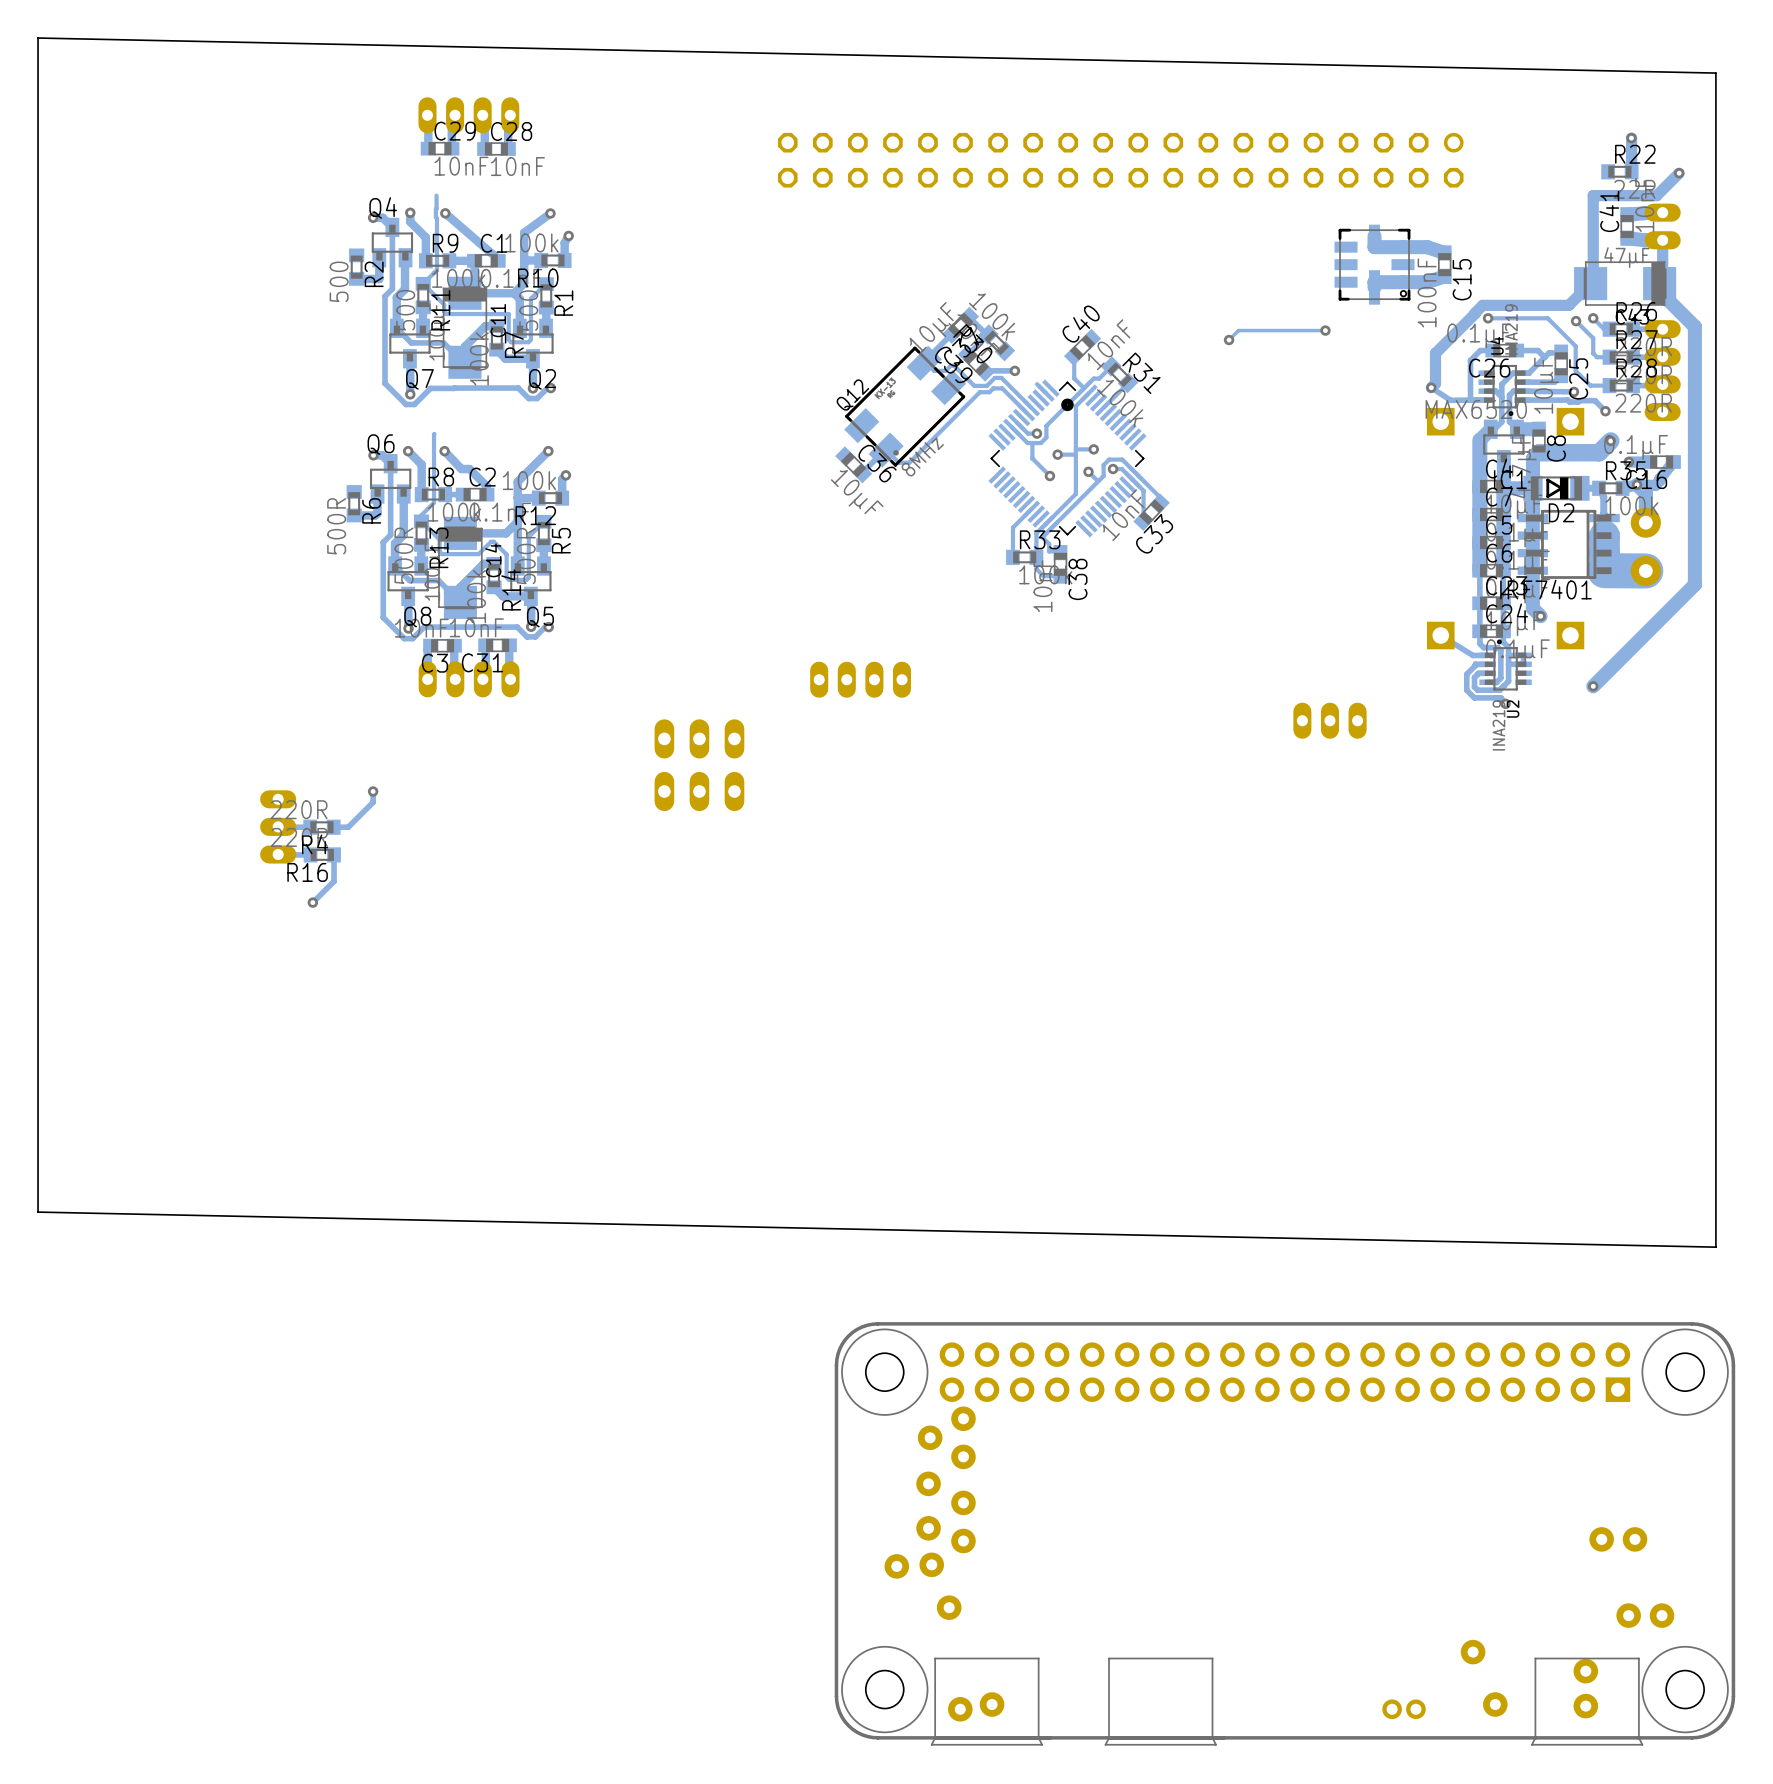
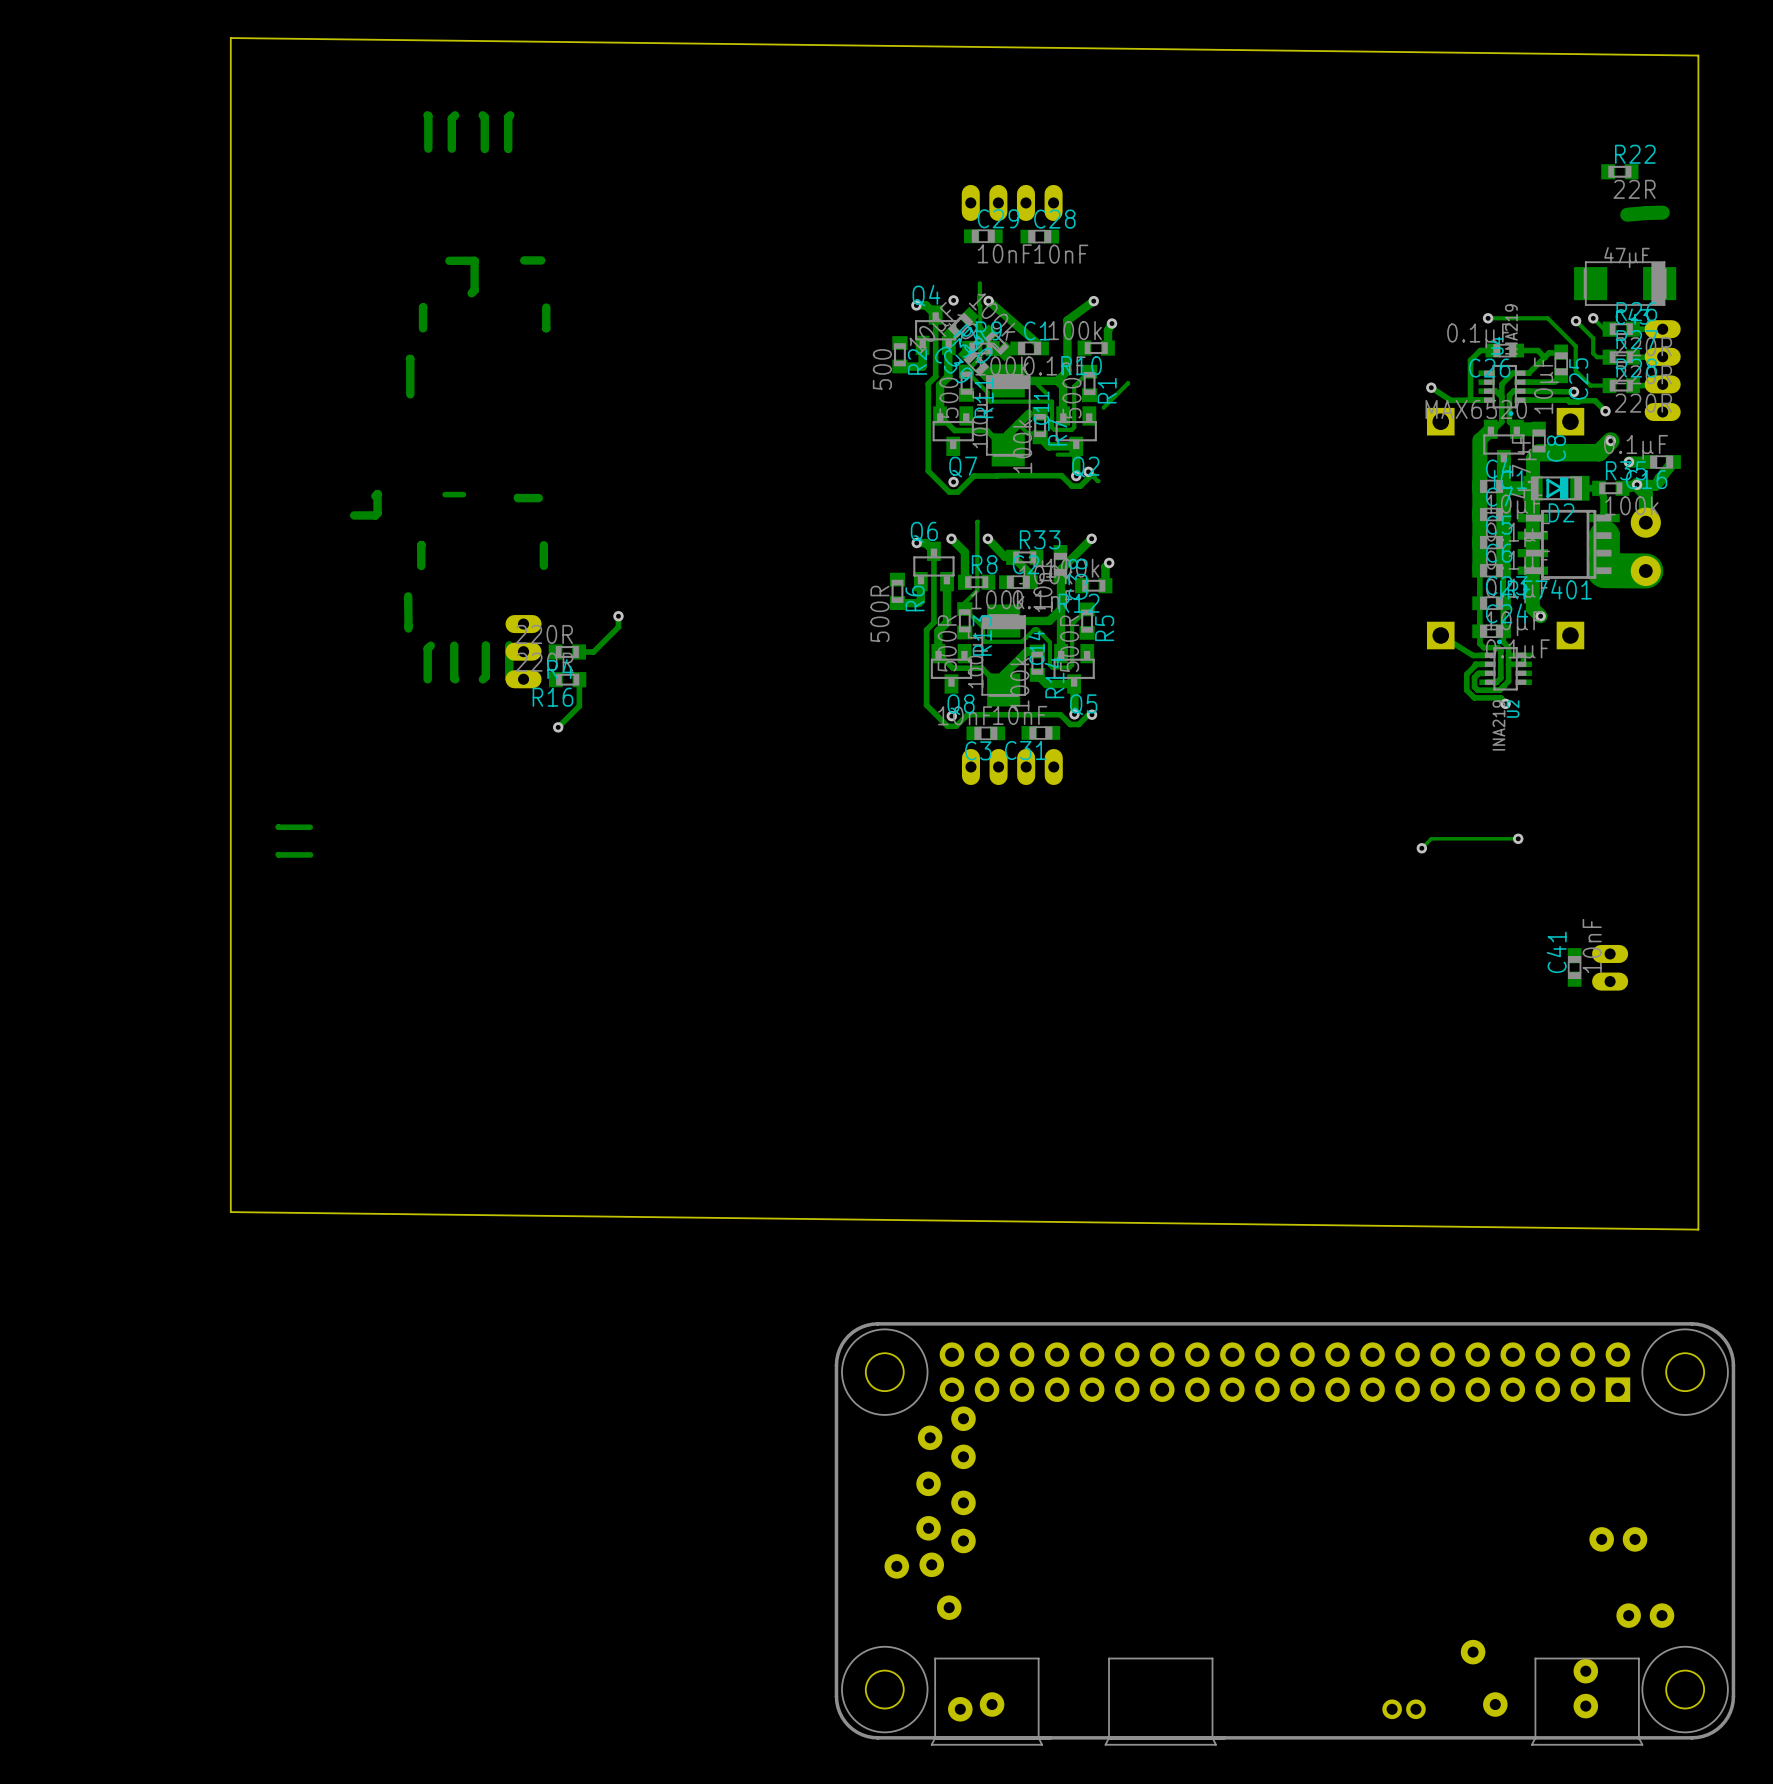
board edge: (38, 38) (38, 1212) (1715, 1247) (1715, 73) (38, 38) -> (230, 38) (1698, 55) (1698, 1229) (230, 1212) (230, 38)
part: (468, 115) -> none
track: (1631, 138) (1631, 171) -> none
via: (1631, 138) -> none
C29 position: (440, 148) -> (983, 236)
C28 position: (496, 149) -> (1039, 236)
part: (1120, 160) -> none
track: (1679, 173) (1656, 195) (1593, 195) (1593, 281) (1568, 305) (1482, 305) (1435, 353) (1435, 383) (1431, 387) -> none
via: (1679, 173) -> none
track: (436, 195) (436, 270) (423, 283) (444, 304) (444, 311) (446, 314) (508, 314) (508, 339) (511, 342) (528, 342) (530, 339) (530, 298) (546, 284) -> none
part: none -> (1012, 202)
track: (410, 212) (410, 221) (425, 237) (425, 260) -> none
via: (410, 212) -> none
track: (445, 213) (498, 260) -> none
via: (445, 213) -> none
track: (550, 213) (524, 232) (524, 283) (514, 293) -> none
via: (550, 213) -> none
track: (373, 217) (382, 217) (392, 227) (392, 288) (385, 296) (385, 383) (406, 404) (414, 404) (430, 388) (518, 388) (528, 398) (537, 398) (547, 388) (550, 388) -> none
via: (373, 217) -> none
C41 position: (1627, 226) -> (1574, 967)
part: (1662, 226) -> none
track: (568, 235) (564, 242) (564, 260) -> none
via: (568, 235) -> none
track: (1374, 236) (1374, 247) (1427, 247) (1444, 252) -> none
track: (1627, 238) (1662, 240) (1662, 280) (1659, 283) (1659, 291) (1694, 326) (1694, 584) (1593, 686) -> none
Q4 position: (392, 242) -> (935, 330)
track: (379, 257) (379, 279) (356, 278) -> none
track: (405, 257) (405, 289) (396, 297) (396, 328) (411, 342) (443, 342) (464, 362) (464, 346) (485, 326) -> none
R9 position: (437, 260) -> (980, 348)
C1 position: (486, 260) -> (1029, 348)
R10 position: (552, 260) -> (1096, 348)
part: (1374, 264) -> none
C15: 100nF (1444, 264) -> none
R2 position: (356, 267) -> (899, 354)
track: (1444, 276) (1427, 282) (1374, 282) (1374, 287) -> none
track: none -> (979, 283) (980, 357) (966, 371) (987, 392) (987, 399) (989, 401) (1052, 401) (1052, 427) (1054, 429) (1071, 429) (1074, 427) (1074, 386) (1089, 371)
track: (514, 293) (464, 293) -> none
track: (514, 293) (519, 298) (519, 328) -> none
R11 position: (423, 295) -> (966, 383)
R1 position: (546, 295) -> (1089, 383)
via: none -> (953, 300)
track: none -> (988, 300) (1041, 348)
via: none -> (988, 300)
track: none -> (1093, 301) (1067, 320) (1067, 370) (1057, 380)
via: none -> (1093, 301)
track: none -> (916, 305) (926, 305) (935, 315) (935, 376) (928, 383) (928, 471) (949, 492) (957, 492) (973, 476) (1061, 475) (1072, 486) (1080, 486) (1090, 475) (1094, 475)
via: none -> (916, 305)
track: none -> (1111, 323) (1107, 330) (1107, 348)
via: none -> (1111, 323)
C11 position: (464, 327) -> (1008, 415)
track: (1325, 330) (1238, 330) (1229, 340) -> none
via: (1325, 330) -> none
track: (952, 333) (924, 363) -> none
R7 position: (496, 337) -> (1040, 425)
via: (1229, 340) -> none
Q7 position: (409, 343) -> (953, 431)
Q2 position: (532, 343) -> (1076, 431)
track: none -> (922, 345) (922, 366) (899, 366)
track: none -> (948, 345) (948, 376) (940, 385) (940, 415) (954, 430) (986, 430) (1008, 449) (1008, 434) (1028, 413)
C40: 10nF (1082, 347) -> none
track: (496, 349) (505, 358) (532, 358) (532, 388) -> none
track: (1074, 355) (1074, 378) (1084, 388) -> none
track: (1111, 366) (1099, 378) (1093, 378) (1046, 425) (1046, 437) (1040, 443) (1027, 443) (1011, 427) -> none
track: (932, 368) (934, 370) (945, 370) (950, 365) (954, 365) (974, 385) (986, 385) (994, 377) (1001, 377) (1031, 407) -> none
track: (1014, 370) (980, 370) (984, 371) -> none
via: (1014, 370) -> none
R31: 100k (1119, 374) -> none
track: none -> (1057, 380) (1063, 386) (1063, 415)
track: none -> (1057, 380) (1008, 380)
via: (532, 388) -> none
via: (550, 388) -> none
track: (1088, 393) (1075, 406) (1075, 494) (1036, 533) (1036, 569) (1043, 576) (1060, 576) -> none
via: (410, 394) -> none
Q12: 8MHz (905, 406) -> none
track: (1026, 412) (1002, 388) (993, 388) (989, 392) (979, 392) (909, 462) (898, 462) (885, 450) (861, 473) -> none
track: (434, 433) (434, 502) (421, 515) (421, 521) (439, 539) (439, 551) (442, 554) (478, 554) (491, 541) (493, 541) (506, 554) (506, 577) (509, 579) (526, 579) (528, 577) (528, 536) (543, 521) -> none
via: (1036, 433) -> none
track: none -> (1040, 437) (1048, 446) (1076, 446) (1076, 476)
track: (1032, 443) (1032, 458) (1049, 476) -> none
track: (1093, 449) (1075, 449) -> none
via: (1093, 449) -> none
track: (408, 451) (421, 464) (421, 494) -> none
via: (408, 451) -> none
track: (444, 451) (461, 469) (469, 469) (486, 486) (486, 494) -> none
via: (444, 451) -> none
track: (548, 451) (517, 481) (517, 566) -> none
via: (548, 451) -> none
via: (1057, 454) -> none
track: (373, 455) (382, 455) (390, 463) (390, 535) (383, 542) (383, 617) (404, 638) (412, 638) (424, 627) (517, 627) (527, 636) (535, 636) (545, 627) (548, 627) -> none
via: (373, 455) -> none
part: (1067, 458) -> none
C36: 10µF (853, 464) -> none
track: (1113, 469) (1121, 469) (1143, 491) (1143, 520) -> none
via: (1113, 469) -> none
track: (565, 475) (562, 479) (562, 498) -> none
via: (565, 475) -> none
via: (1049, 476) -> none
via: none -> (1076, 476)
Q6 position: (390, 478) -> (933, 566)
via: none -> (953, 481)
track: (403, 494) (403, 534) (395, 543) (395, 566) (409, 580) (438, 580) (460, 602) (460, 587) (483, 563) (494, 563) -> none
R8 position: (433, 494) -> (976, 582)
C2 position: (475, 494) -> (1018, 582)
R12 position: (550, 498) -> (1093, 585)
R6 position: (354, 503) -> (897, 591)
track: (1159, 503) (1159, 496) (1122, 459) (1109, 459) (1103, 465) (1103, 476) (1042, 536) (1049, 544) (1049, 551) (1060, 552) -> none
track: (1031, 509) (1012, 527) (1012, 557) -> none
C33: 10nF (1151, 512) -> none
track: (517, 521) (505, 533) (460, 533) -> none
track: none -> (977, 521) (977, 590) (964, 602) (964, 609) (982, 627) (982, 639) (985, 641) (1021, 641) (1034, 629) (1037, 629) (1049, 642) (1049, 665) (1052, 667) (1069, 667) (1072, 665) (1072, 624) (1087, 609)
R13 position: (421, 533) -> (964, 620)
R5 position: (543, 533) -> (1087, 621)
track: none -> (951, 538) (964, 552) (964, 582)
via: none -> (951, 538)
track: none -> (987, 538) (1004, 556) (1012, 556) (1030, 573) (1030, 582)
via: none -> (987, 538)
track: none -> (1091, 538) (1061, 569) (1061, 653)
via: none -> (1091, 538)
track: none -> (916, 542) (925, 542) (933, 551) (933, 622) (926, 630) (926, 705) (947, 726) (956, 726) (967, 714) (1060, 714) (1070, 724) (1078, 724) (1088, 714) (1092, 714)
via: none -> (916, 542)
track: none -> (1109, 562) (1105, 566) (1105, 585)
via: none -> (1109, 562)
C14 position: (460, 567) -> (1003, 655)
R14 position: (494, 575) -> (1037, 663)
Q8 position: (408, 581) -> (951, 668)
Q5 position: (530, 581) -> (1074, 668)
track: none -> (947, 581) (947, 622) (938, 631) (938, 653) (952, 668) (981, 668) (1003, 689) (1003, 674) (1026, 651) (1037, 651)
track: none -> (918, 583) (920, 581) (920, 600) (918, 603) (897, 603)
track: (494, 587) (503, 596) (531, 596) (531, 626) -> none
track: none -> (1061, 609) (1049, 620) (1003, 620)
via: none -> (618, 616)
via: (531, 626) -> none
via: (548, 627) -> none
via: (408, 628) -> none
C3 position: (442, 645) -> (985, 733)
C31 position: (497, 645) -> (1040, 732)
track: none -> (1037, 674) (1046, 683) (1074, 684) (1074, 714)
part: (469, 679) -> none
part position: (860, 679) -> (1012, 767)
via: (1593, 686) -> none
via: none -> (1074, 714)
via: none -> (1092, 714)
via: none -> (951, 716)
part: (1329, 720) -> none
via: none -> (558, 727)
part: (699, 738) -> none
track: (373, 791) (373, 802) (348, 827) (333, 827) -> (618, 616) (618, 627) (593, 651) (579, 651)
via: (373, 791) -> none
part: (699, 791) -> none
part position: (278, 826) -> (523, 651)
R4 position: (321, 827) -> (567, 651)
track: none -> (1518, 838) (1431, 838) (1421, 848)
via: none -> (1518, 838)
via: none -> (1421, 848)
R16 position: (322, 854) -> (567, 679)
track: (334, 854) (334, 881) (312, 902) -> (579, 679) (579, 706) (558, 727)
via: (312, 902) -> none
part: none -> (1610, 967)

